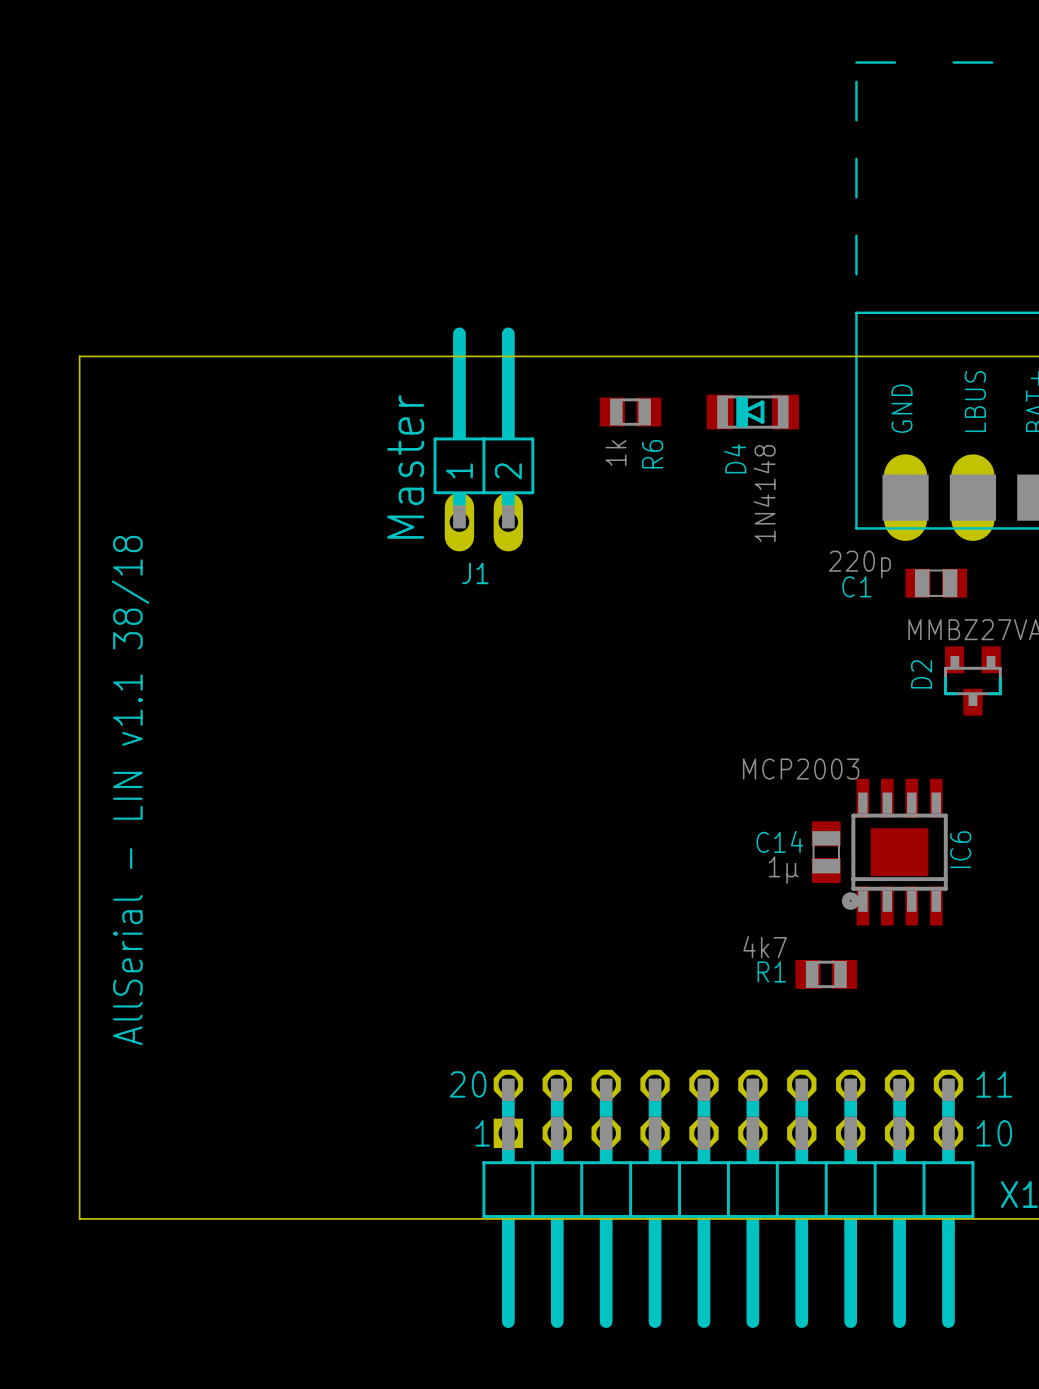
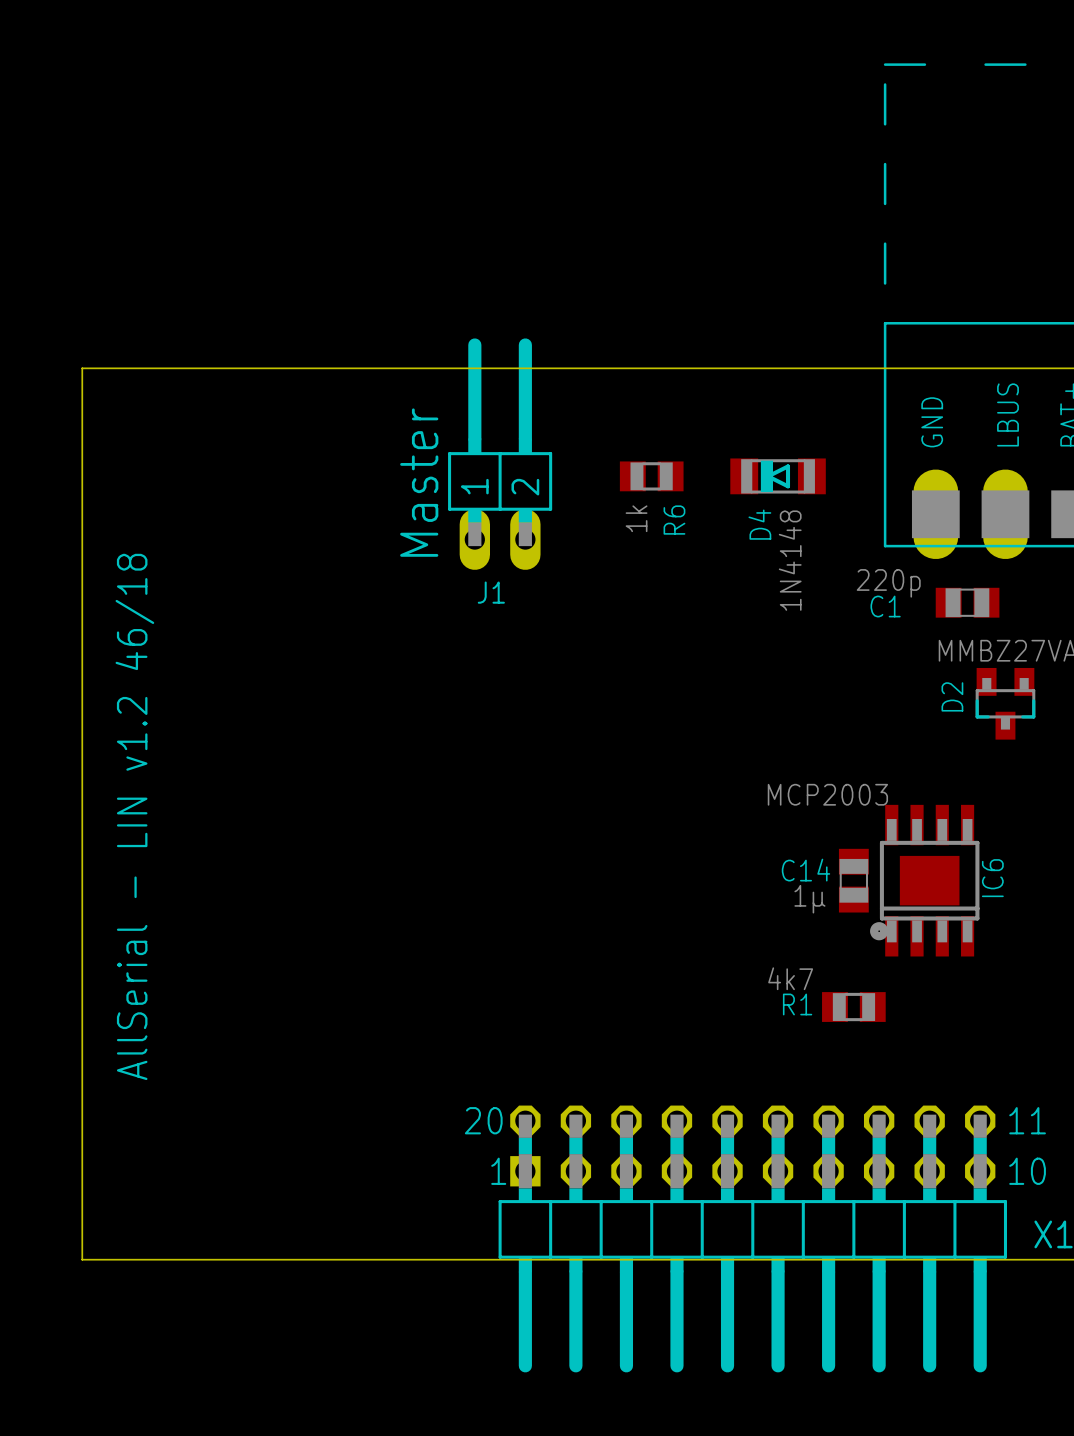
R6 position: (630, 412) -> (651, 476)
D4 position: (752, 412) -> (778, 476)
text: AllSerial - LIN v1.1 38/18 (130, 790) -> AllSerial - LIN v1.2 46/18 (134, 816)

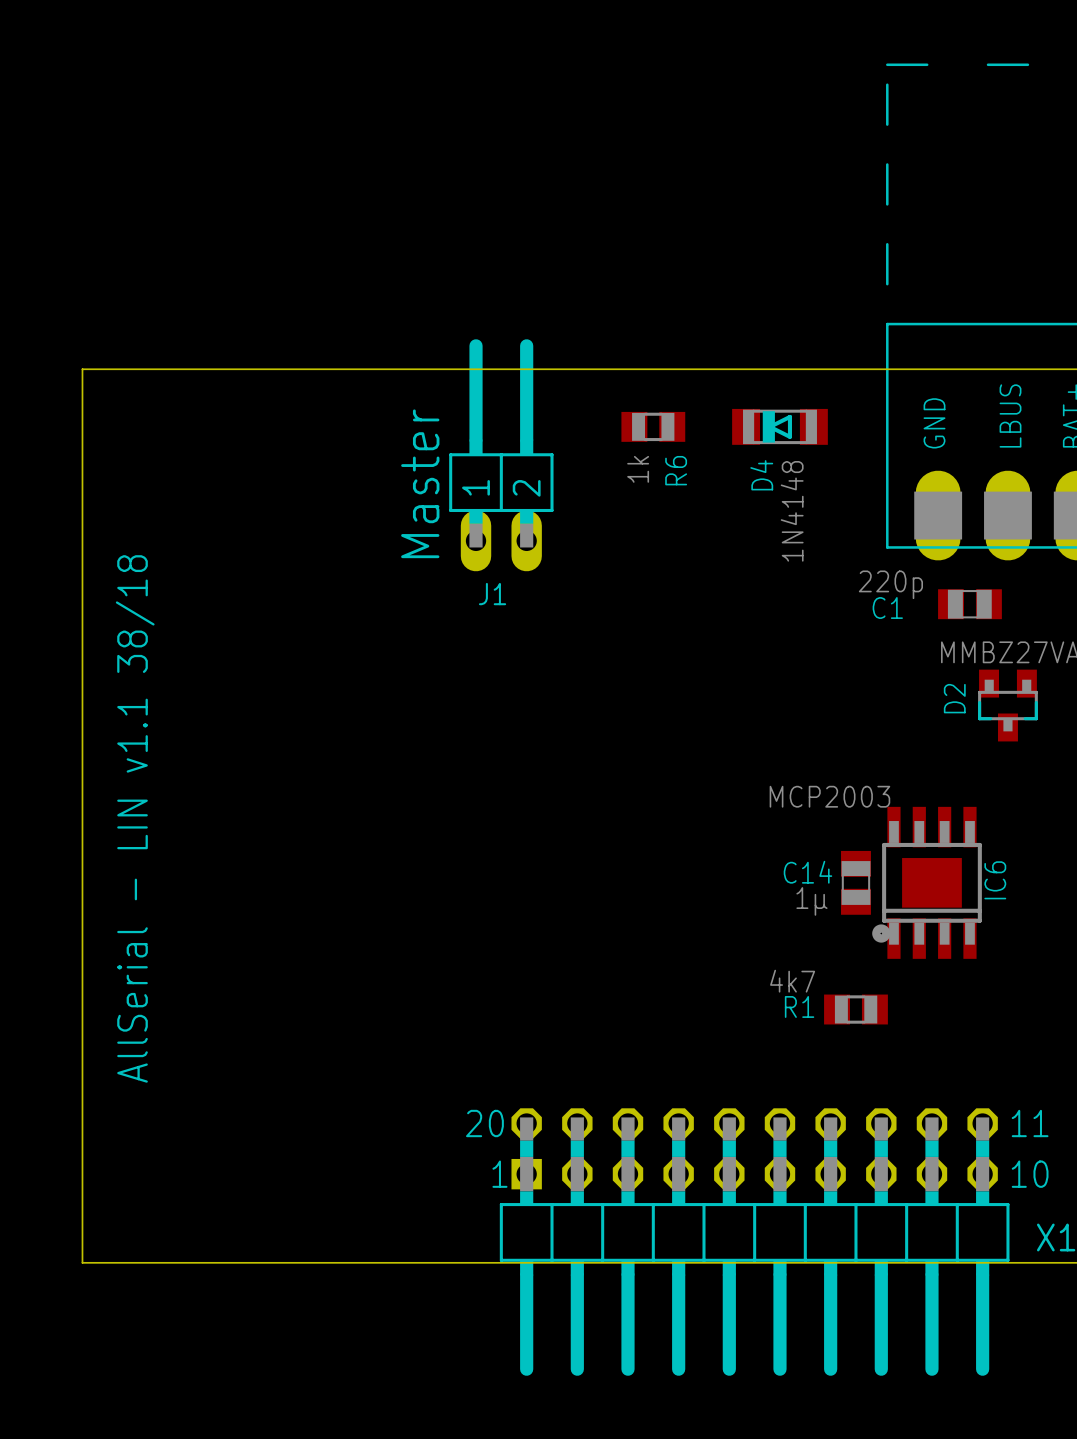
R6 position: (651, 476) -> (653, 426)
D4 position: (778, 476) -> (779, 426)
text: AllSerial - LIN v1.2 46/18 (134, 816) -> AllSerial - LIN v1.1 38/18 (135, 818)

